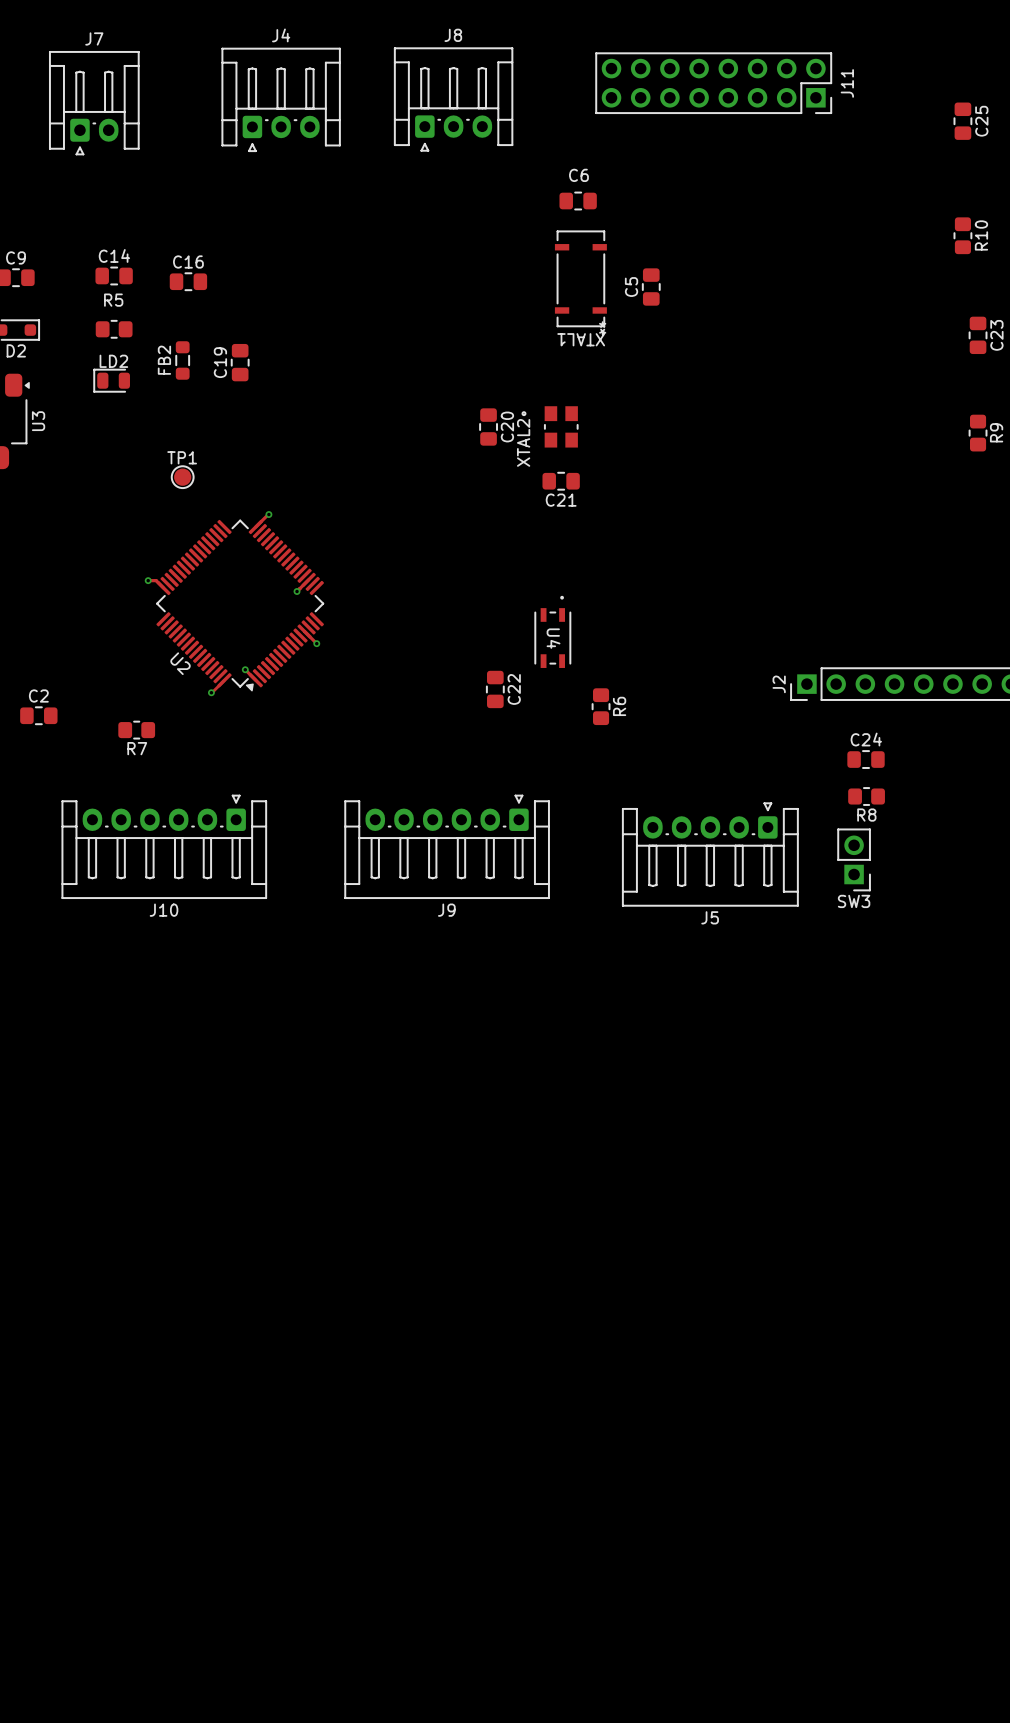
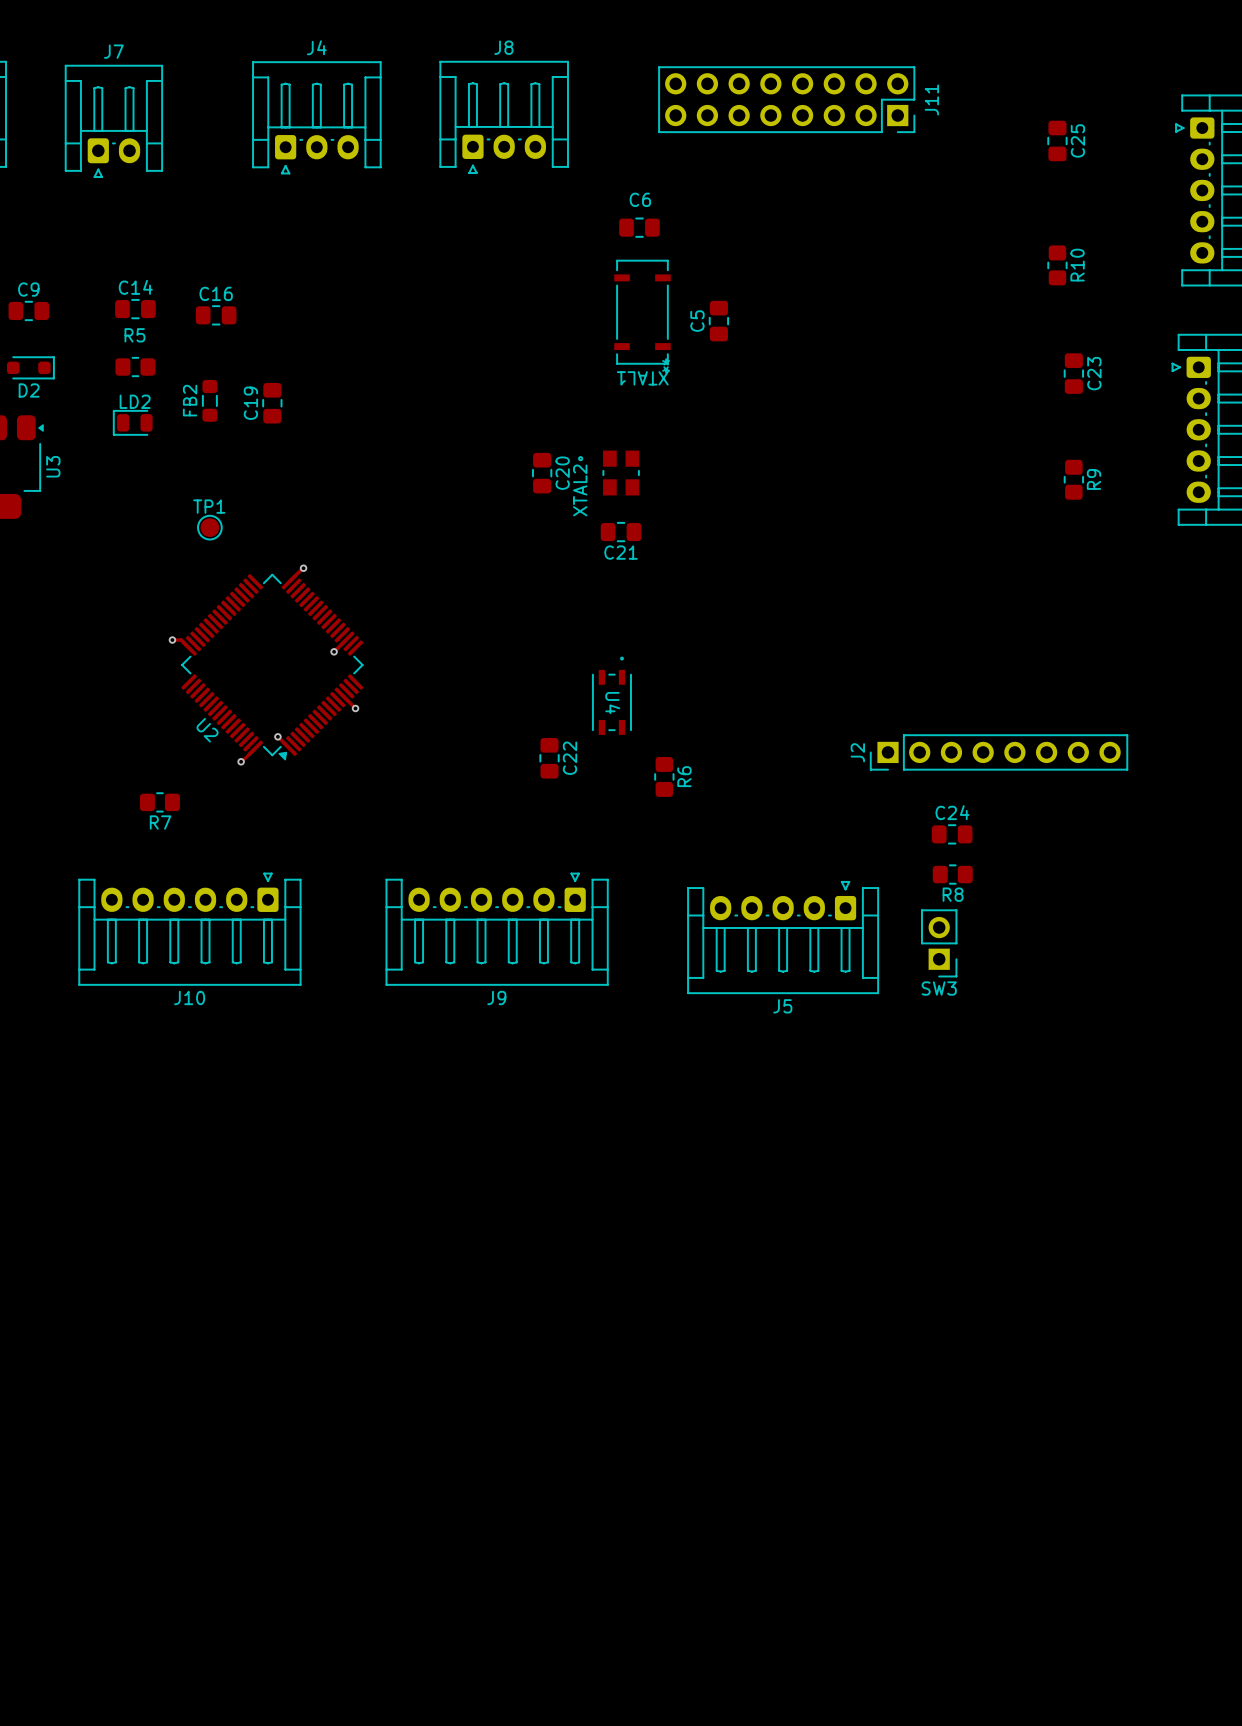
C2: (38, 715) -> none

